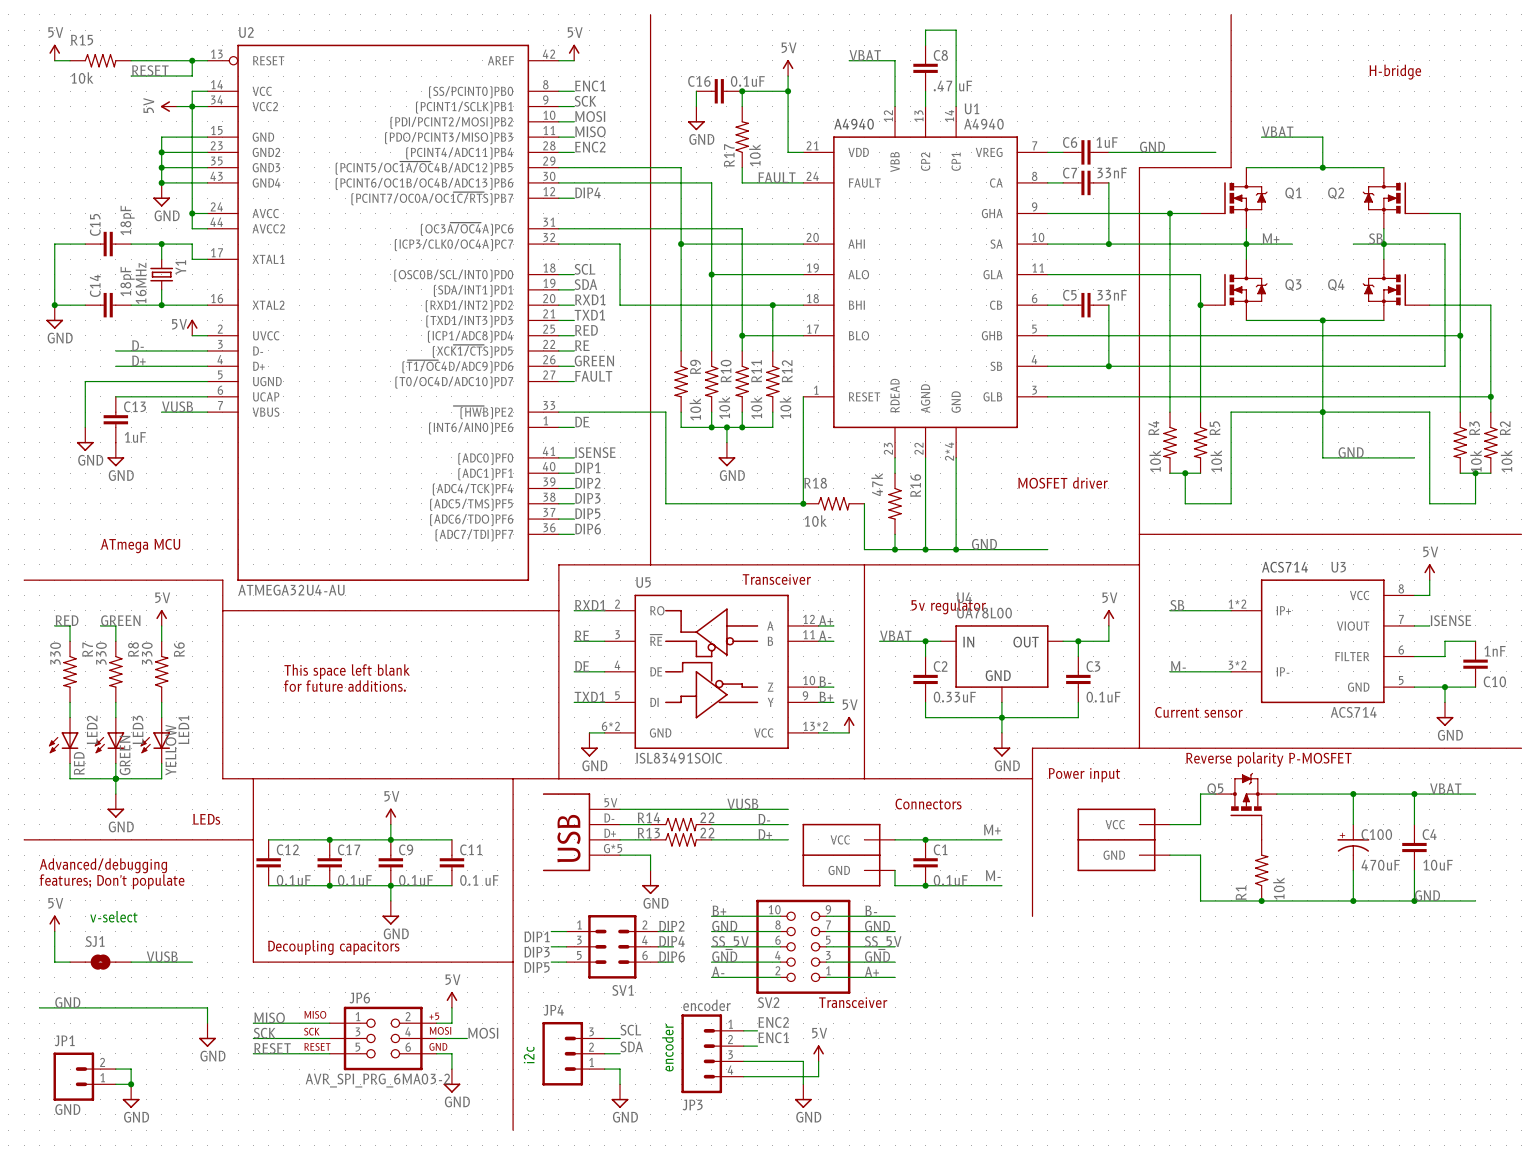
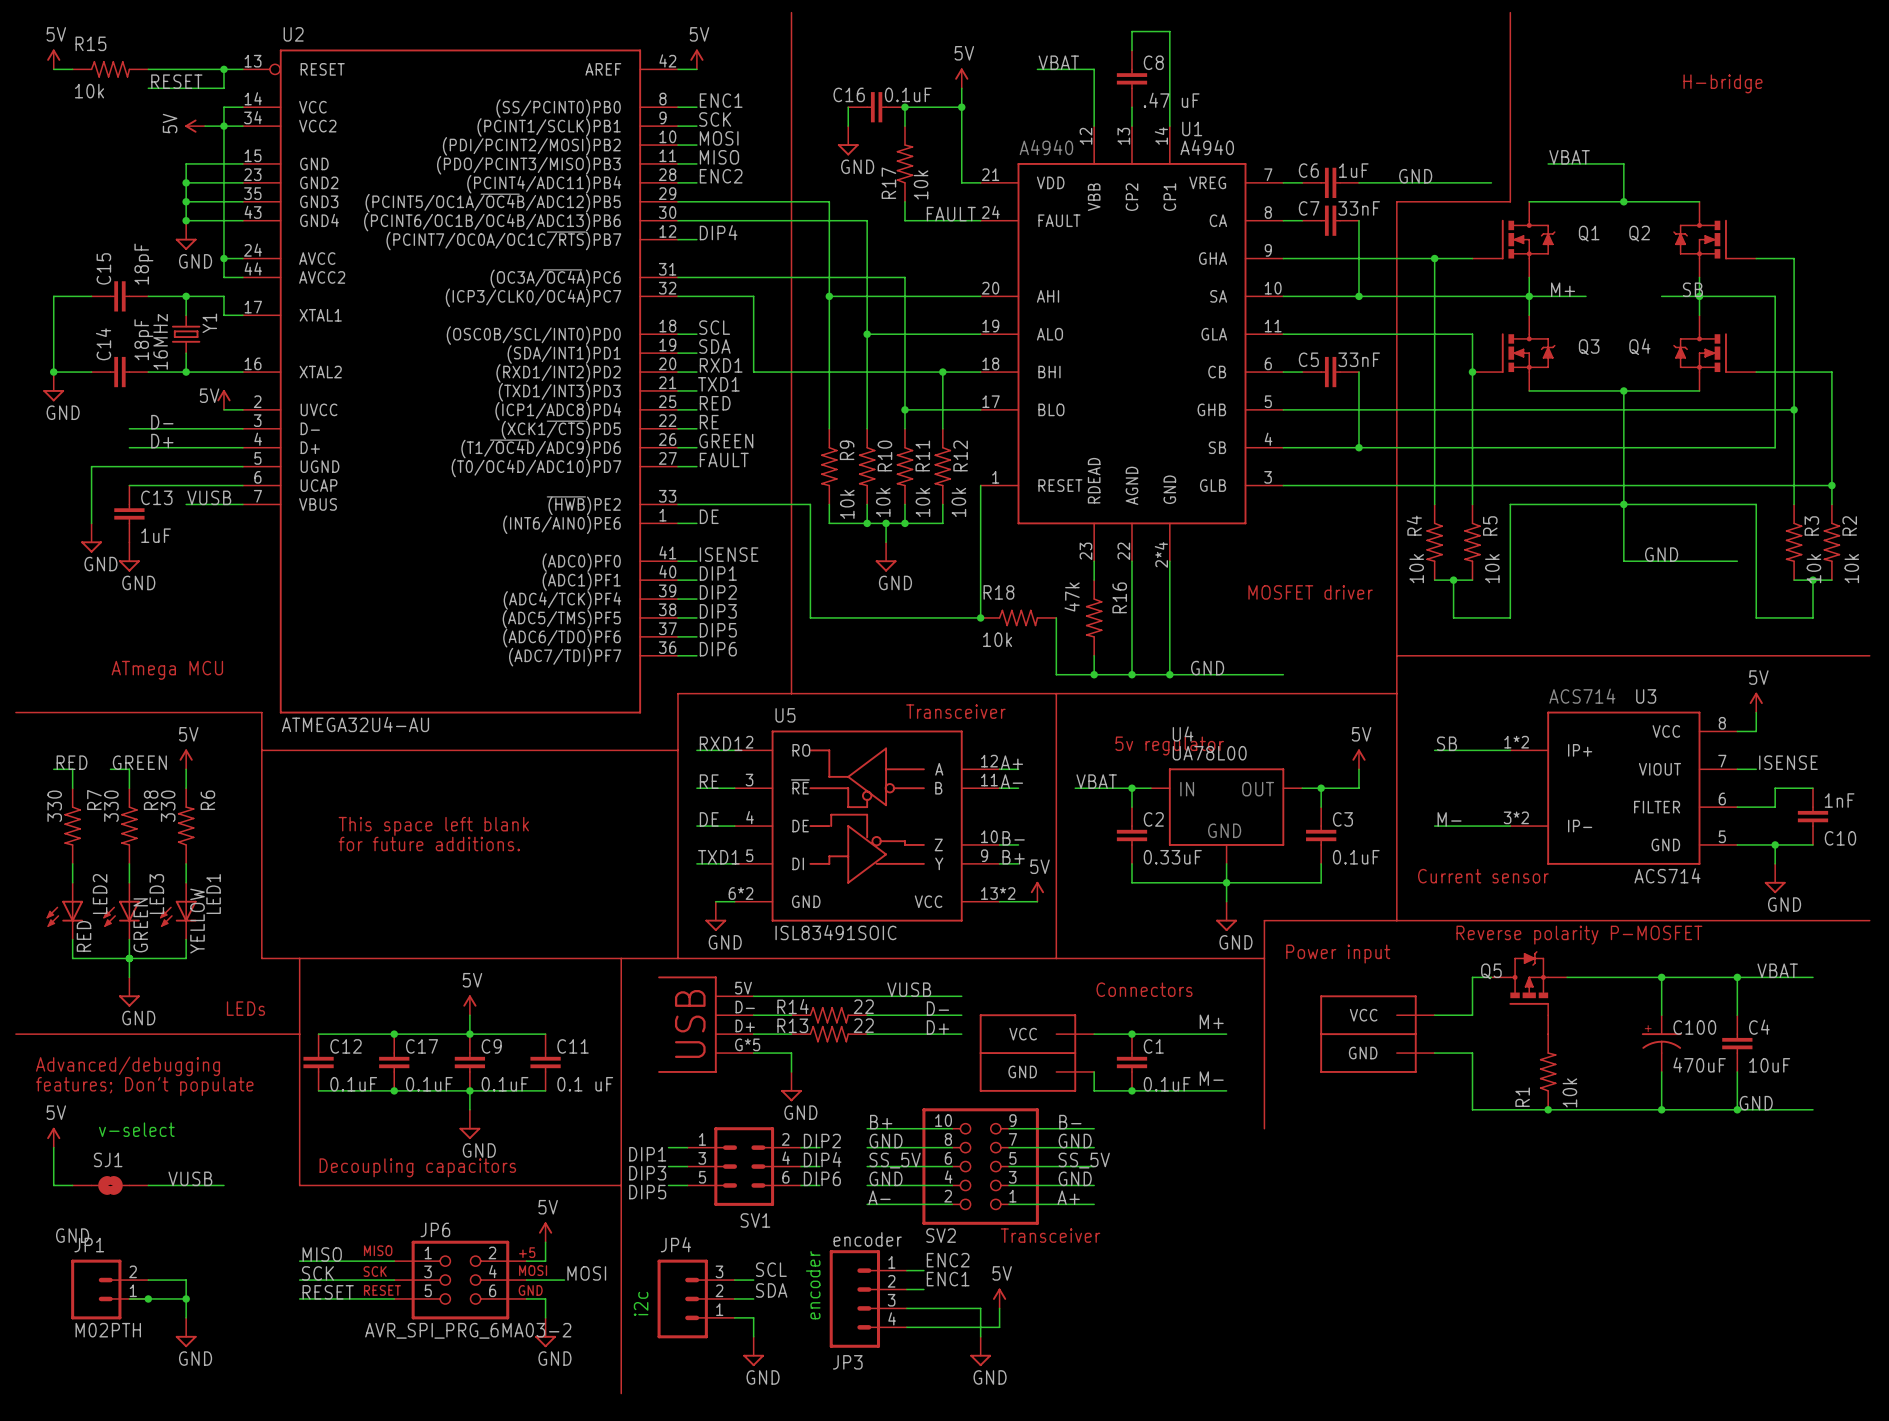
wire: (39, 1007) (207, 1007) (207, 1023) -> none
power symbol: GND (207, 1035) -> none
wire: none -> (148, 1280) (186, 1280) (186, 1317)
wire: none -> (129, 1298) (186, 1298)
junction: none -> (148, 1298)
junction: none -> (186, 1298)
wire: (115, 1069) (131, 1069) (131, 1084) (115, 1084) -> none
JP1 position: (84, 1076) -> (109, 1289)
power symbol: none -> GND (186, 1332)
junction: (131, 1084) -> none
power symbol: GND (131, 1096) -> none
JP1 value: GND (67, 1109) -> M02PTH (108, 1330)

